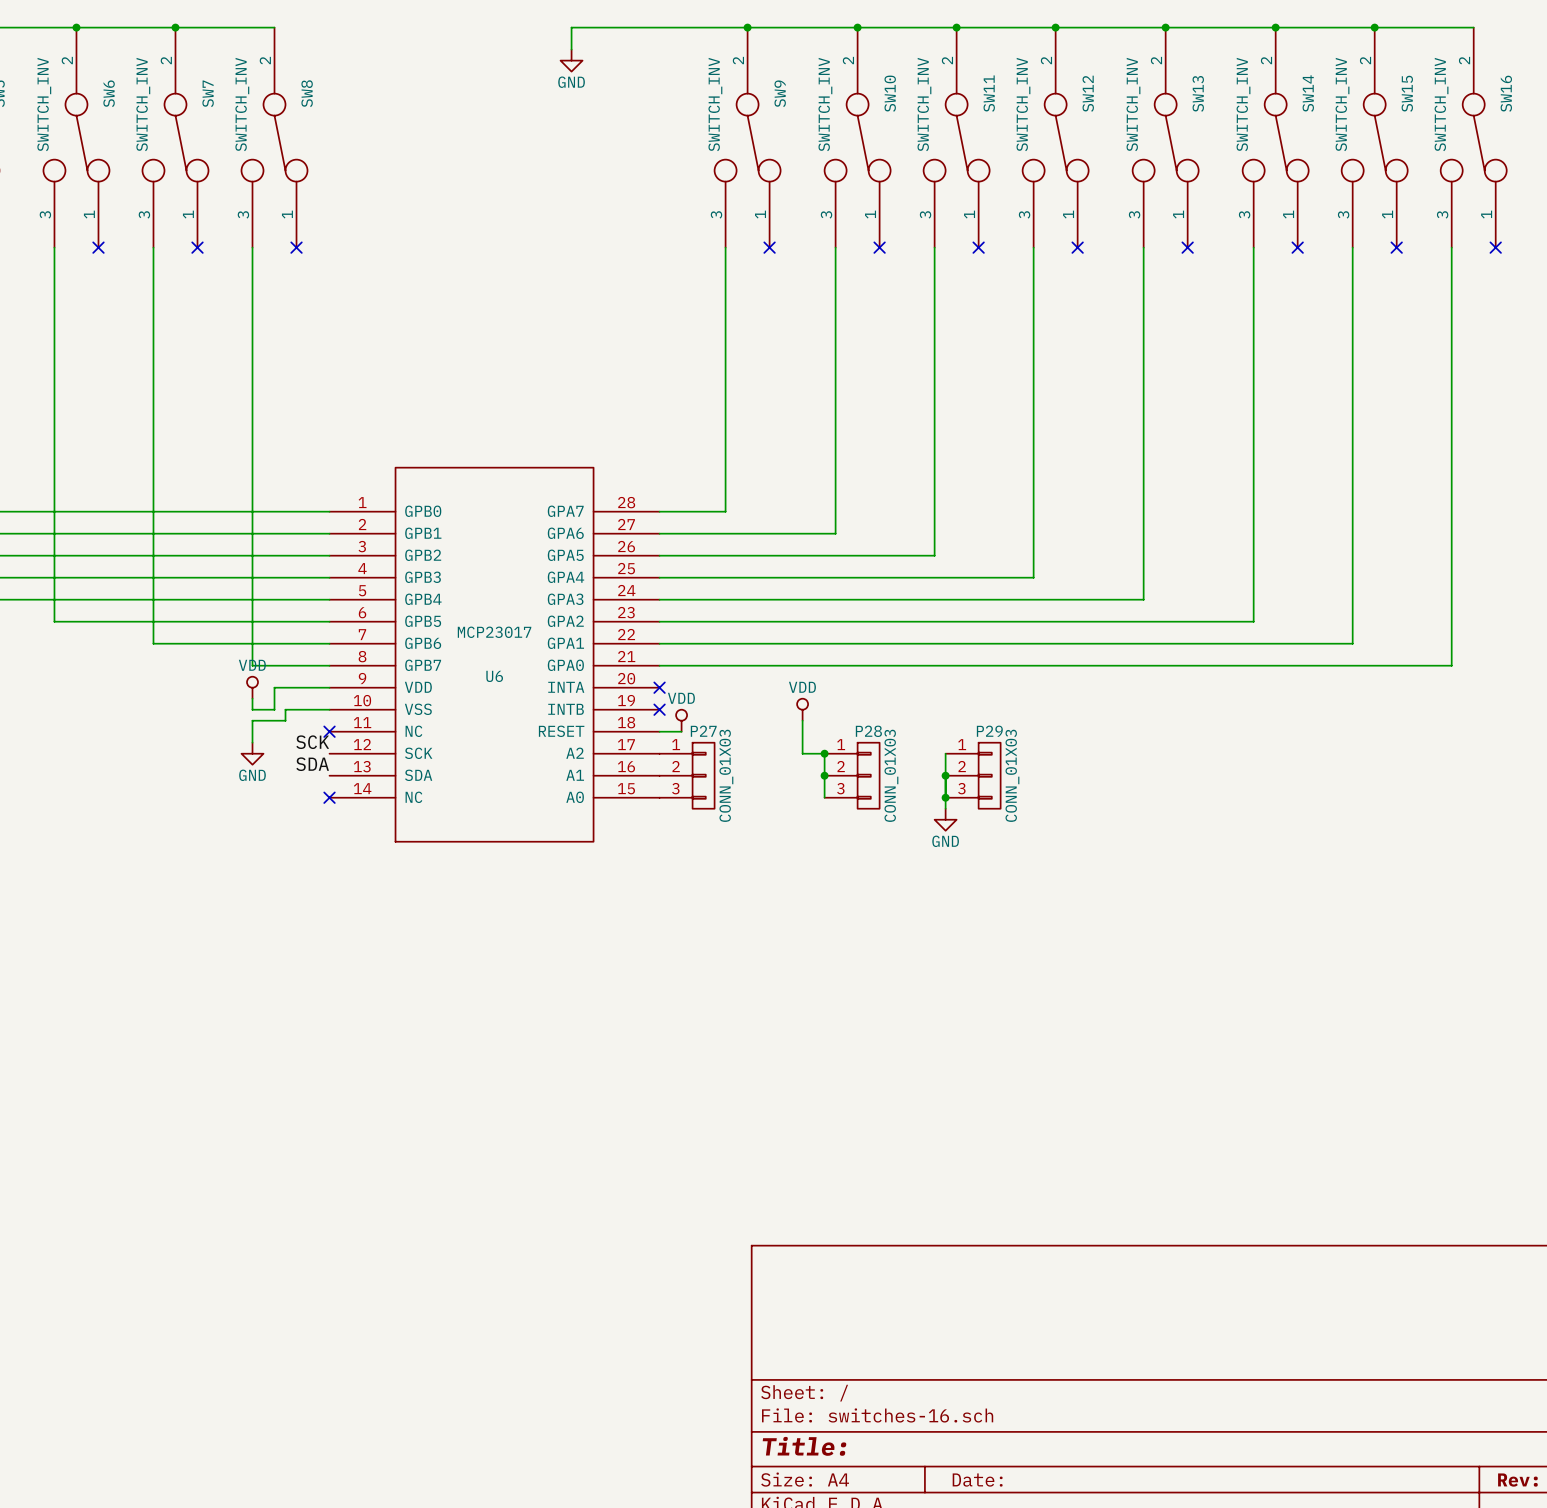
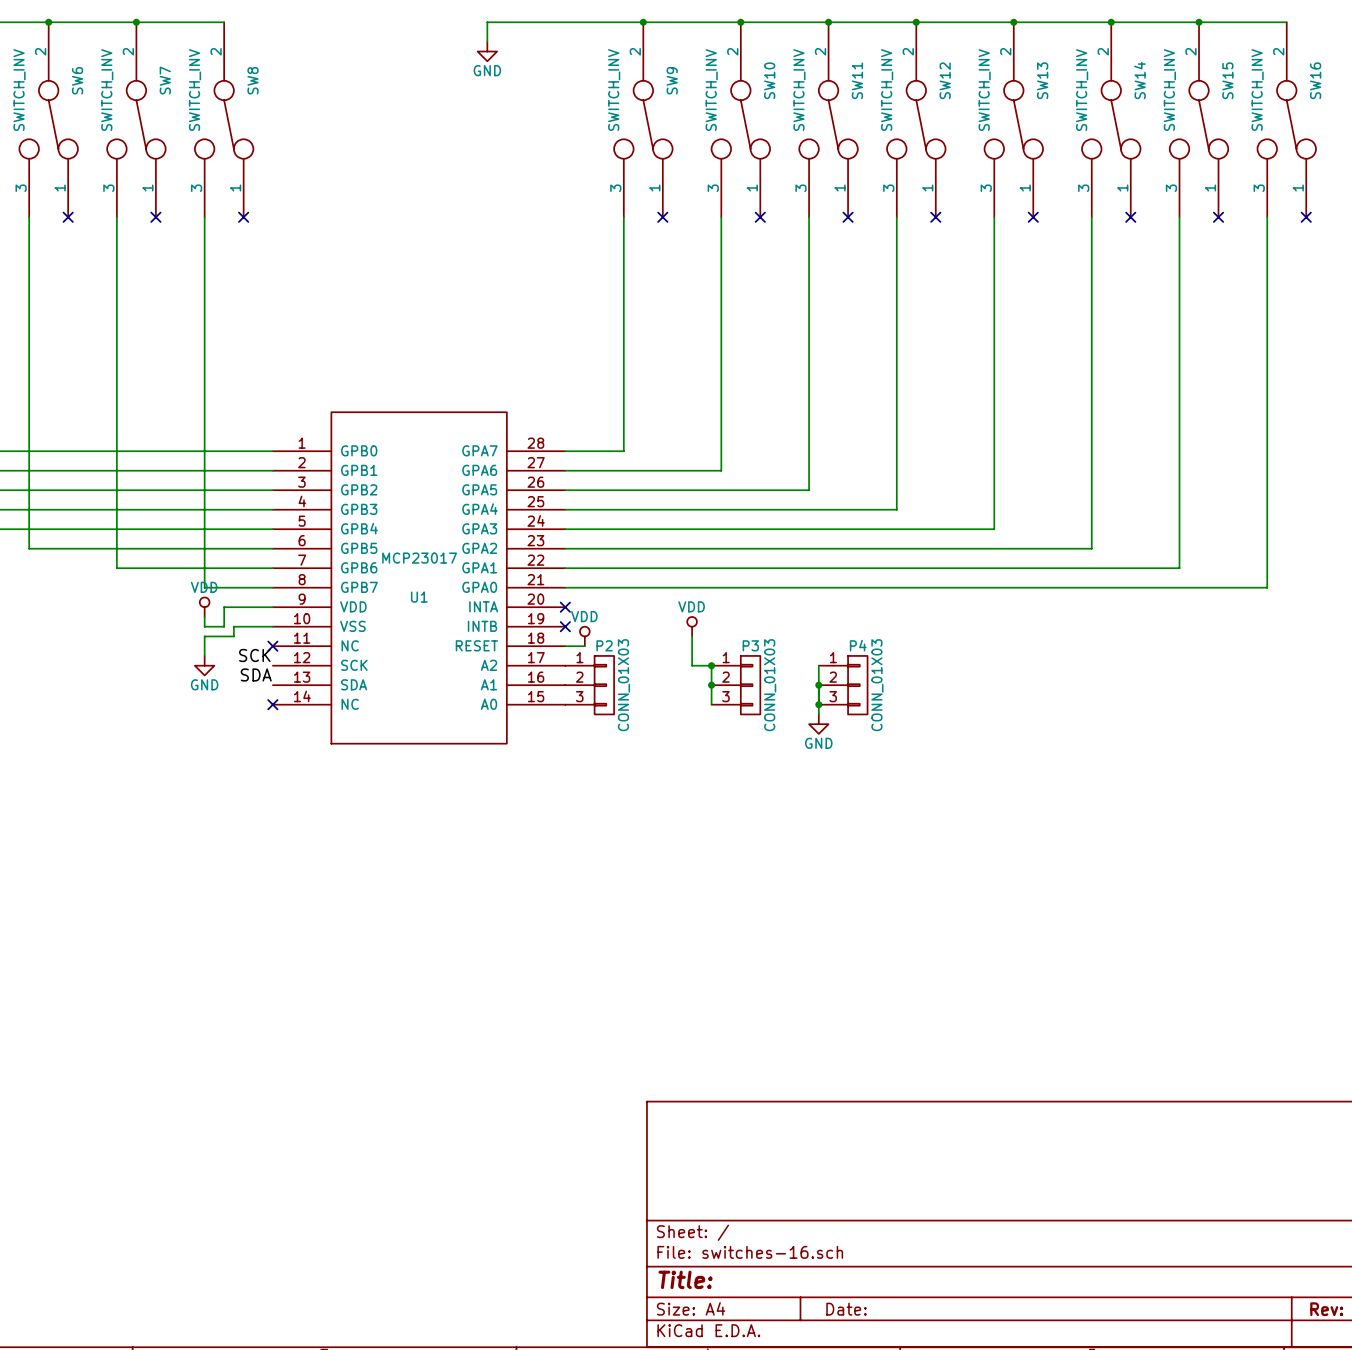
U6 name: U6 (494, 676) -> U1 (419, 597)
P27 name: P27 (703, 731) -> P2 (604, 645)
P28 name: P28 (868, 731) -> P3 (750, 645)
P29 name: P29 (989, 731) -> P4 (858, 645)

